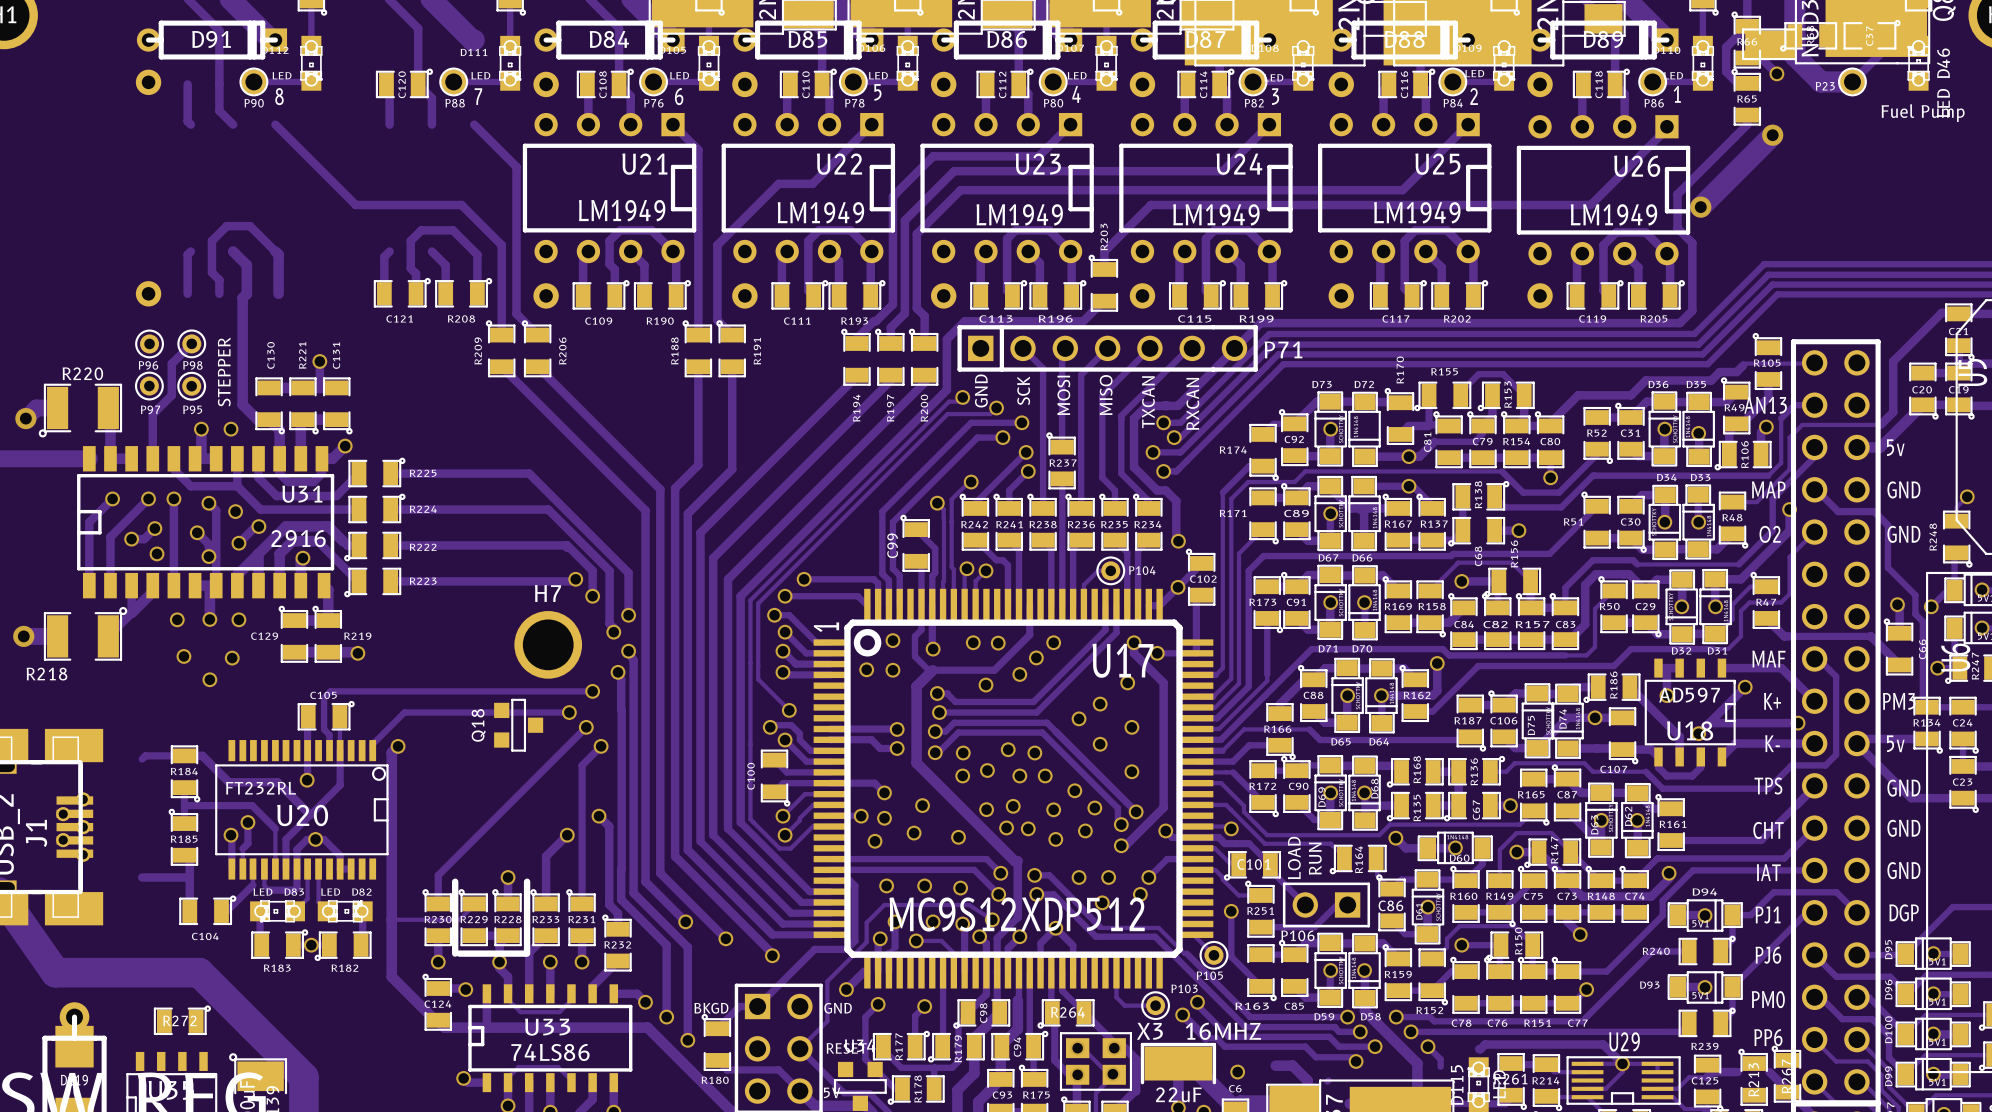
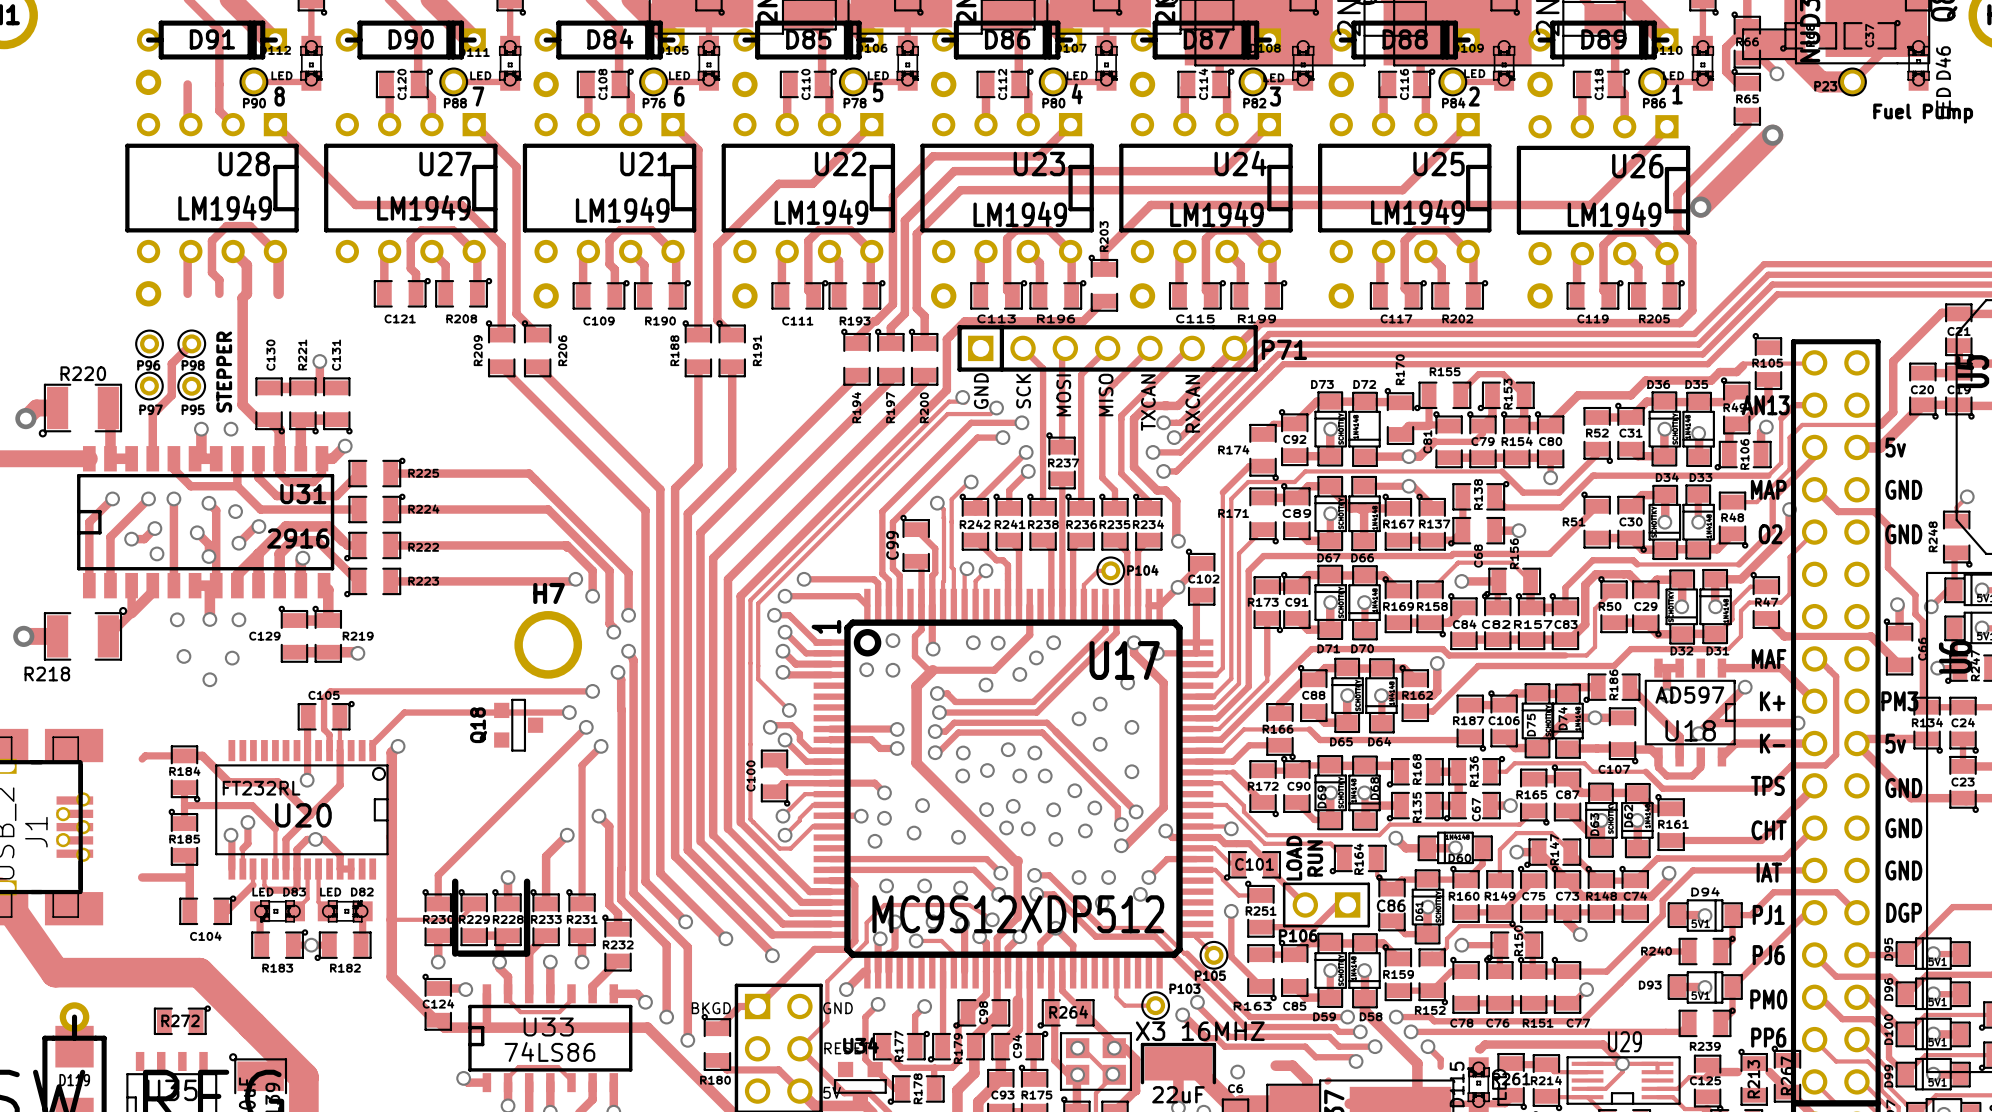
D90: none -> (410, 40)
U28: none -> LM1949 (211, 188)
U27: none -> LM1949 (410, 188)

